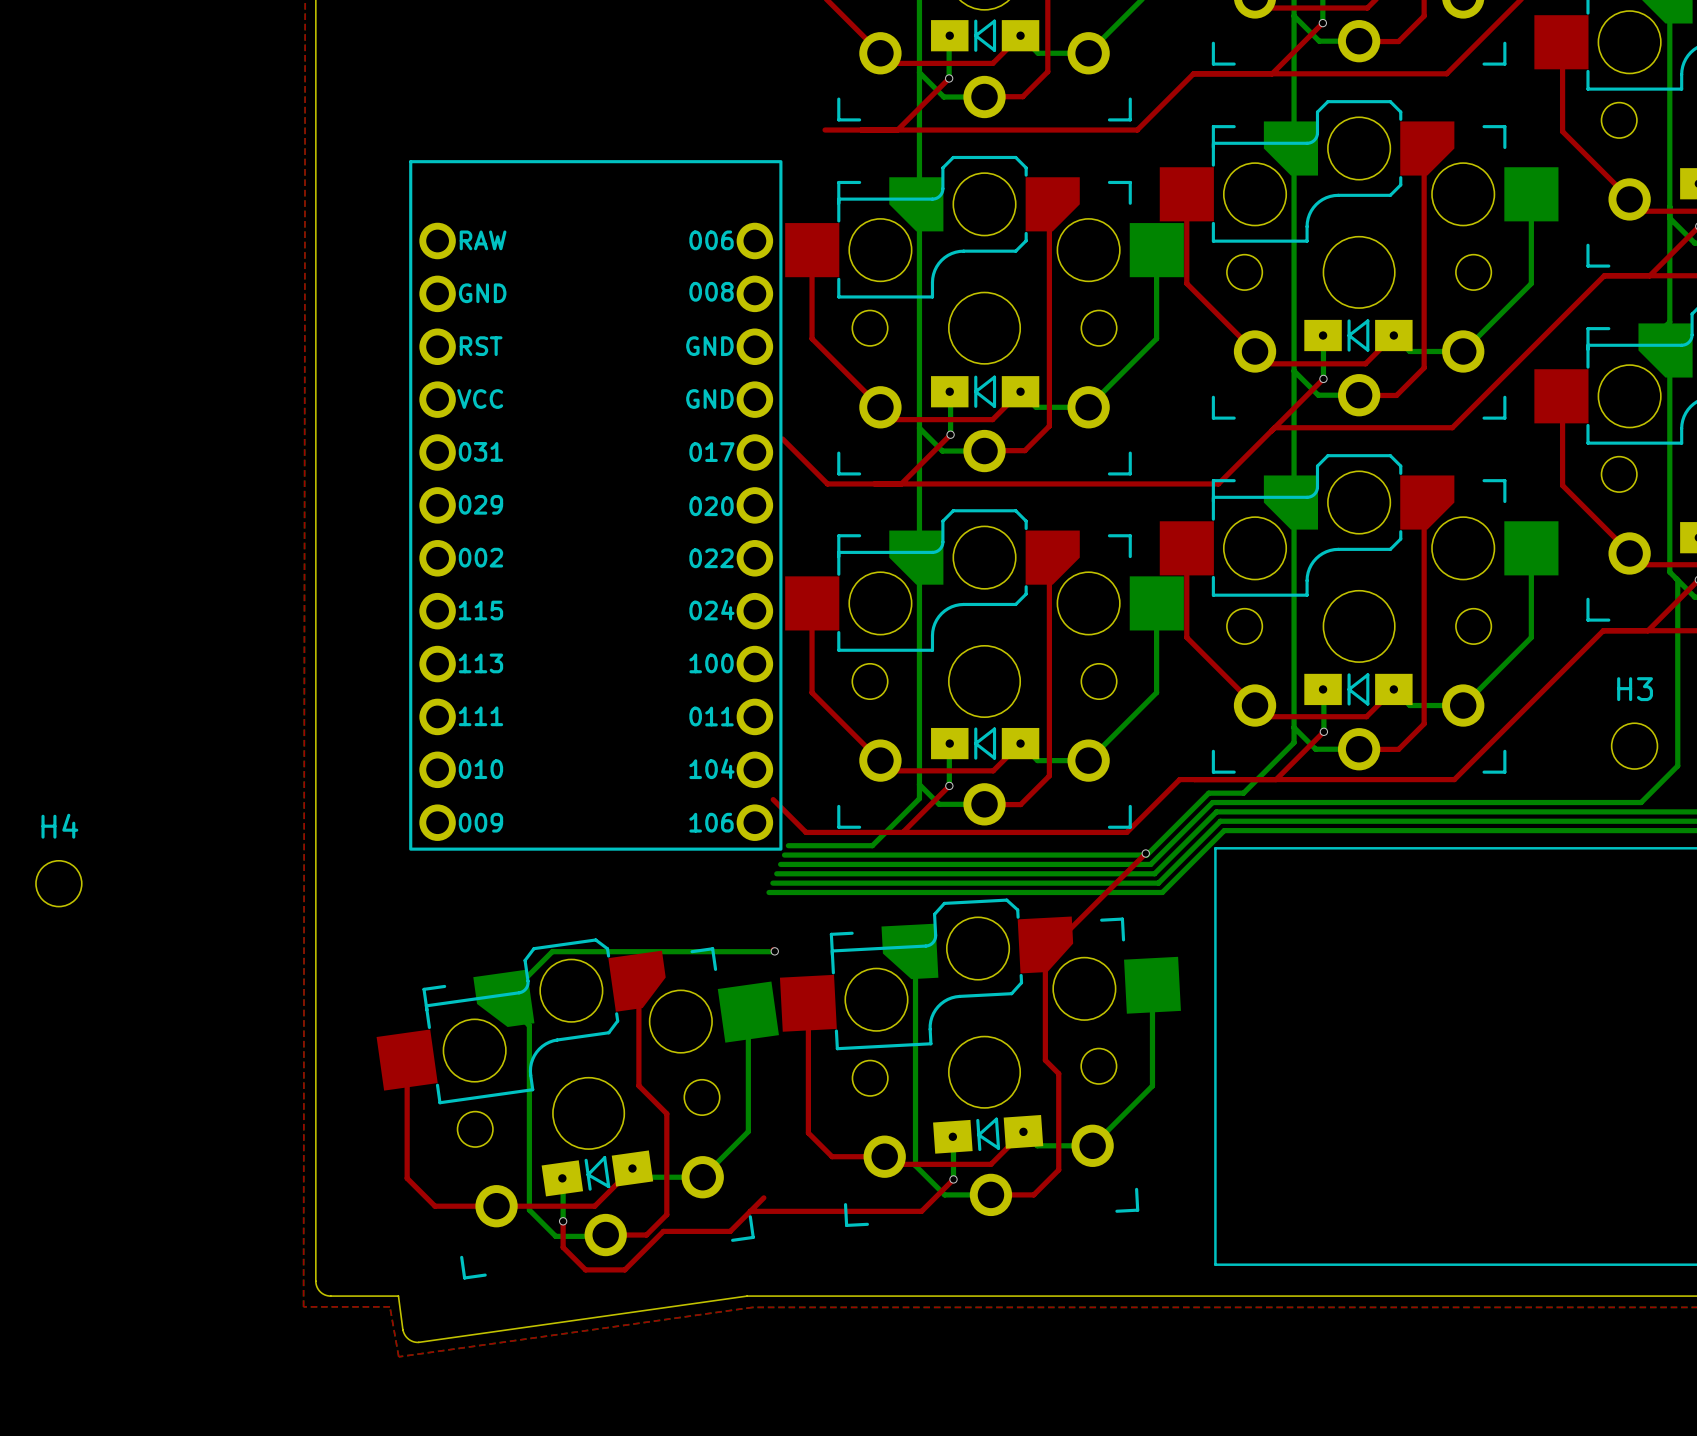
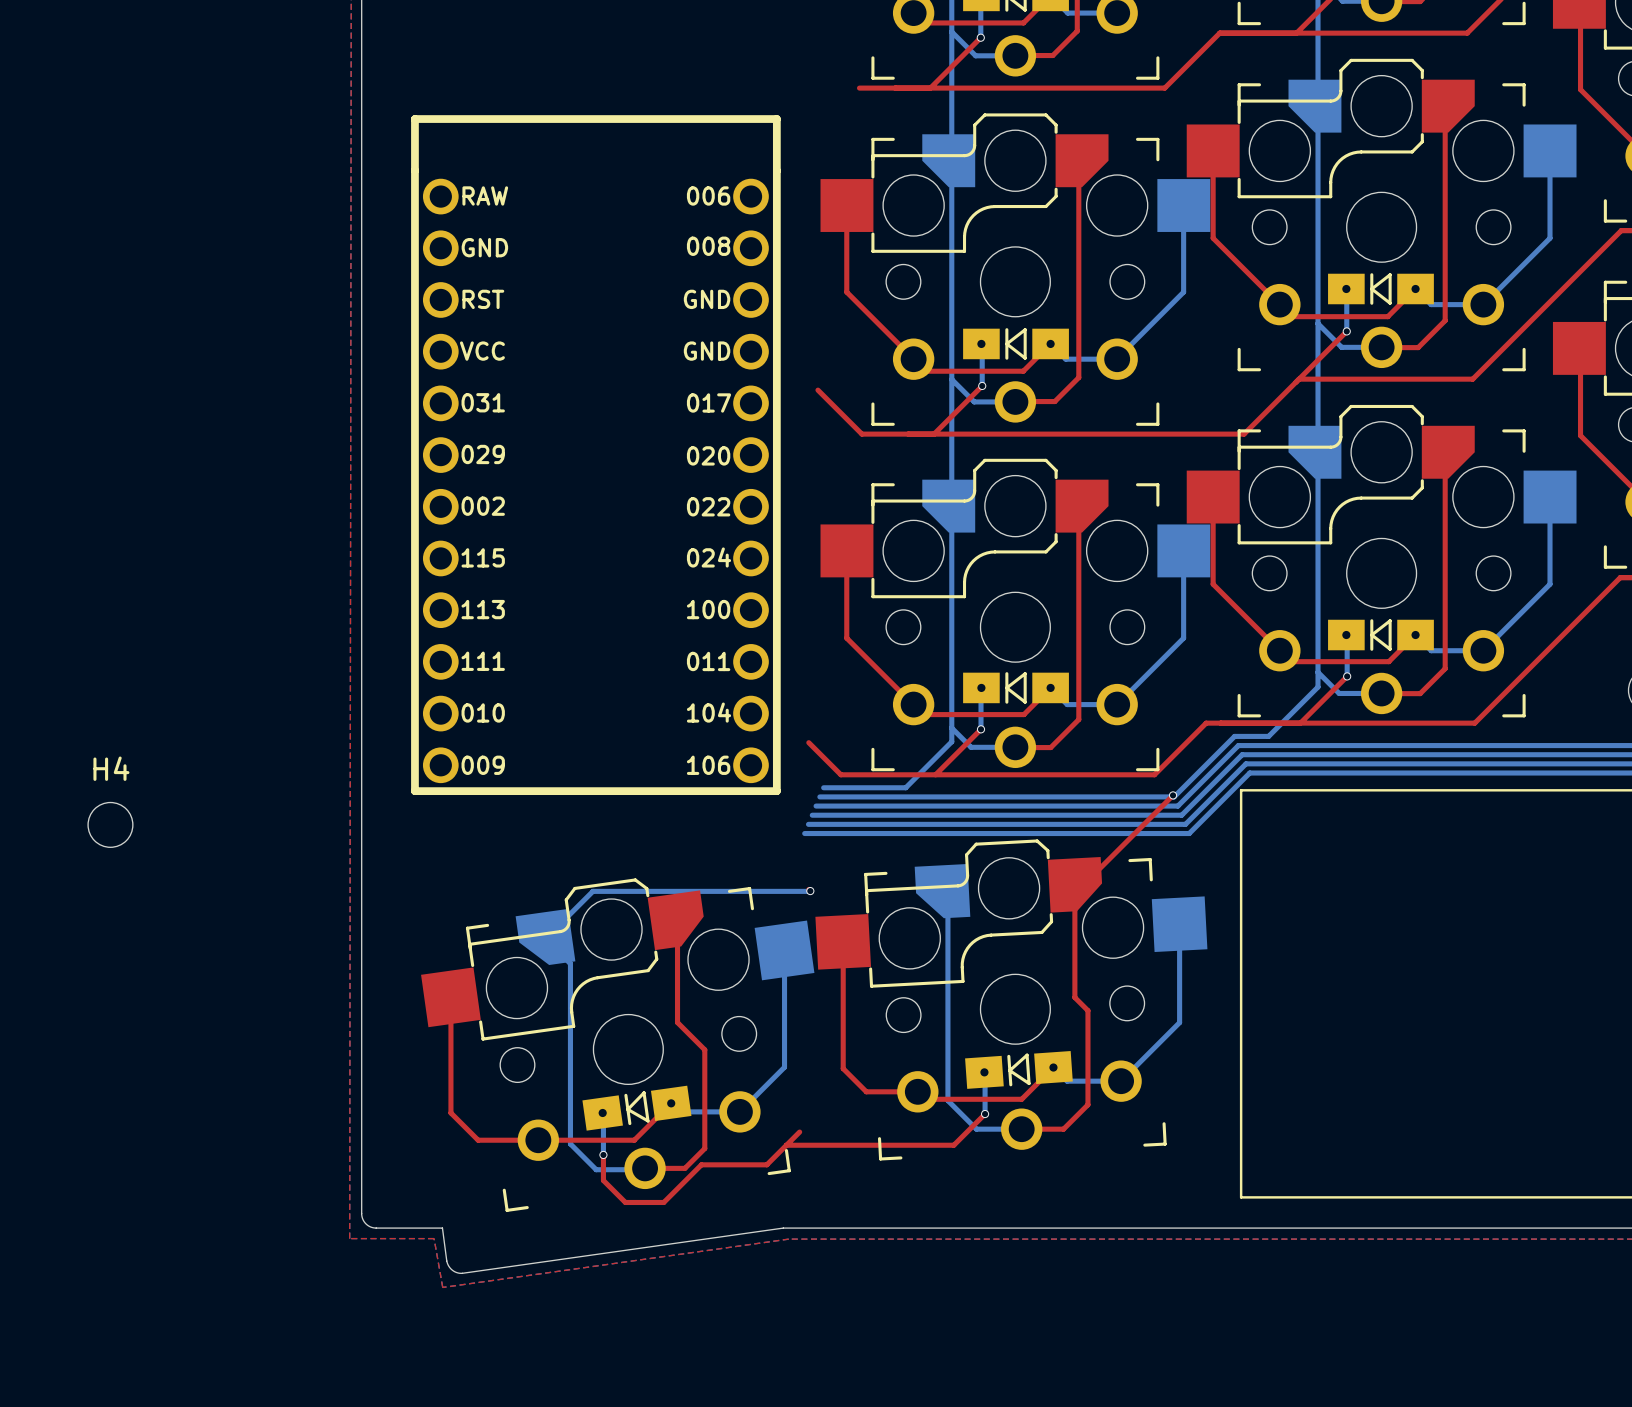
part: none -> (595, 455)
part: (595, 505) -> none

